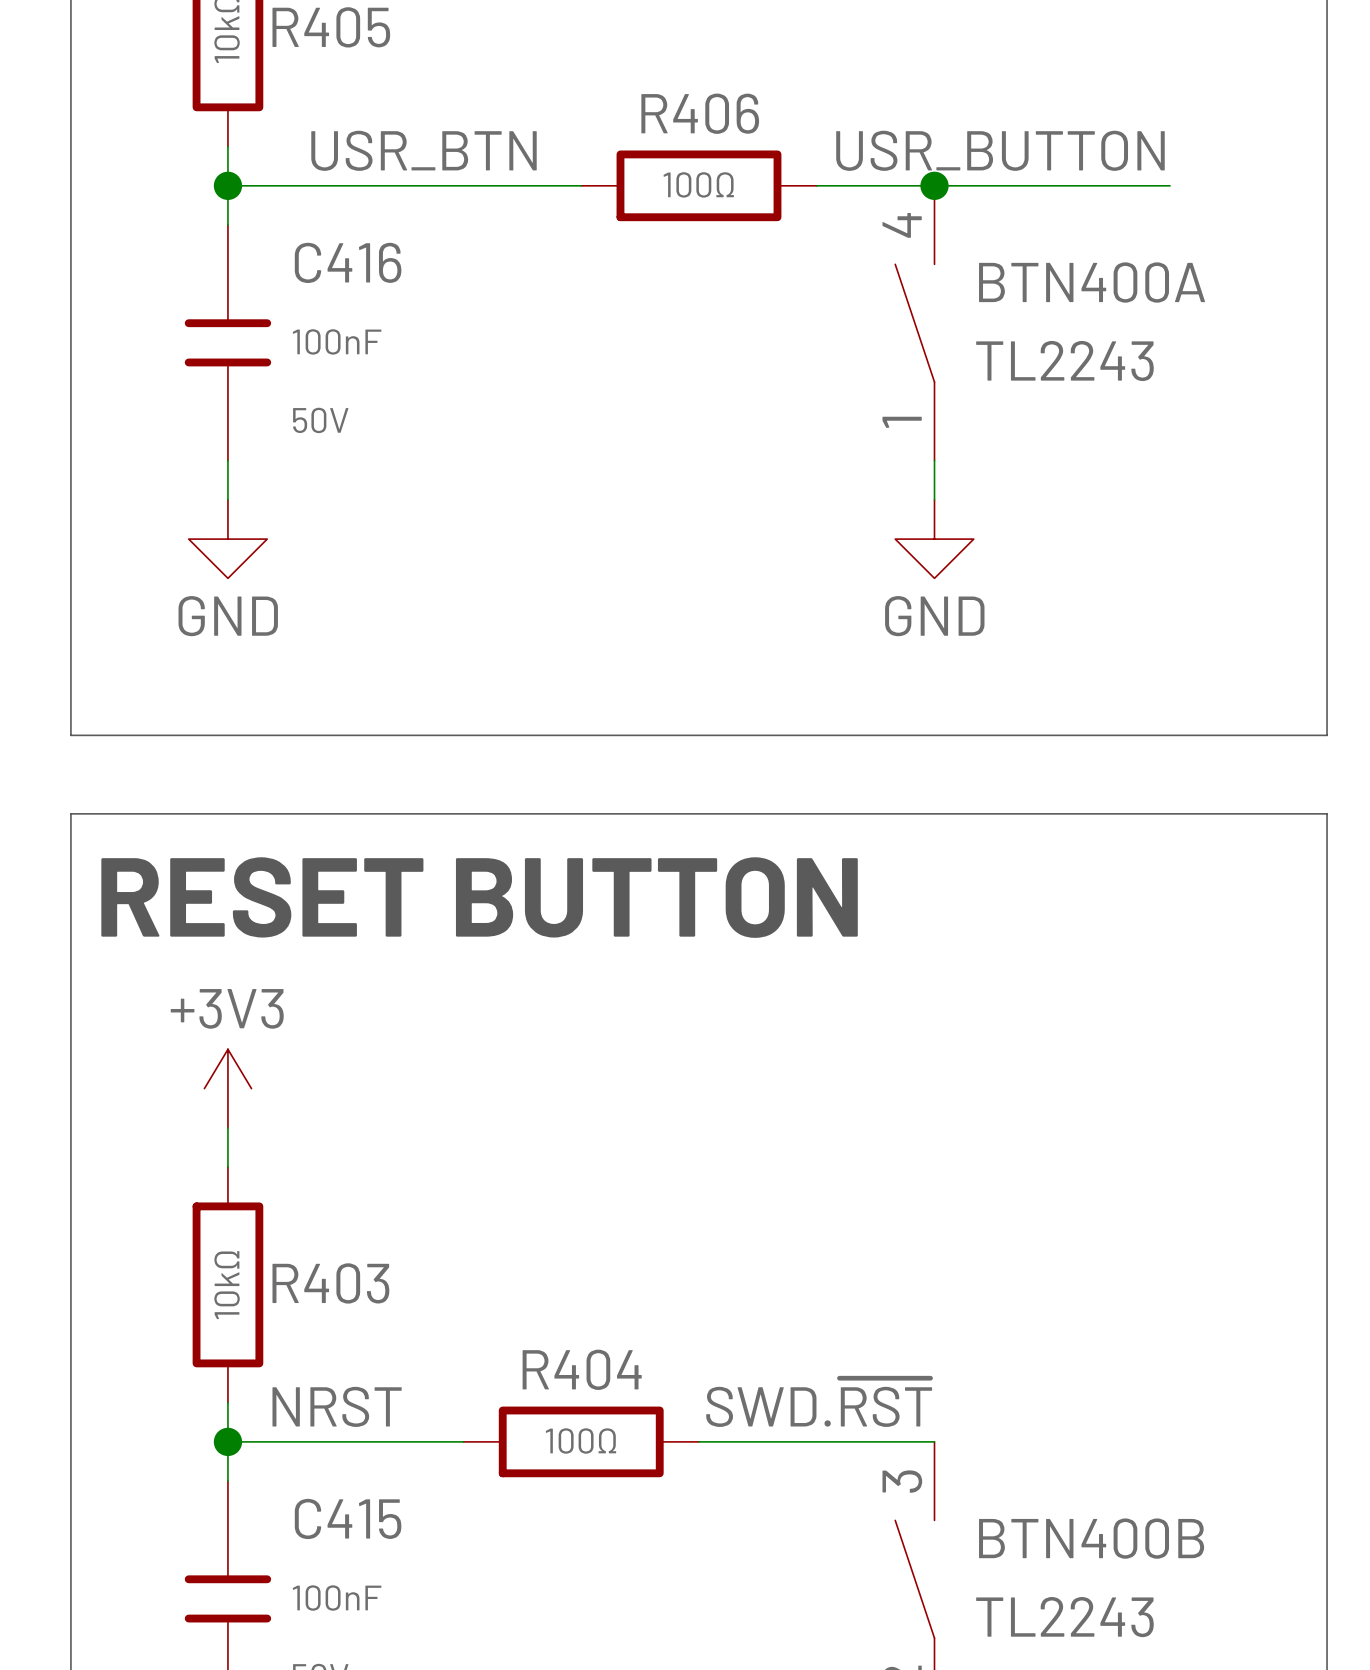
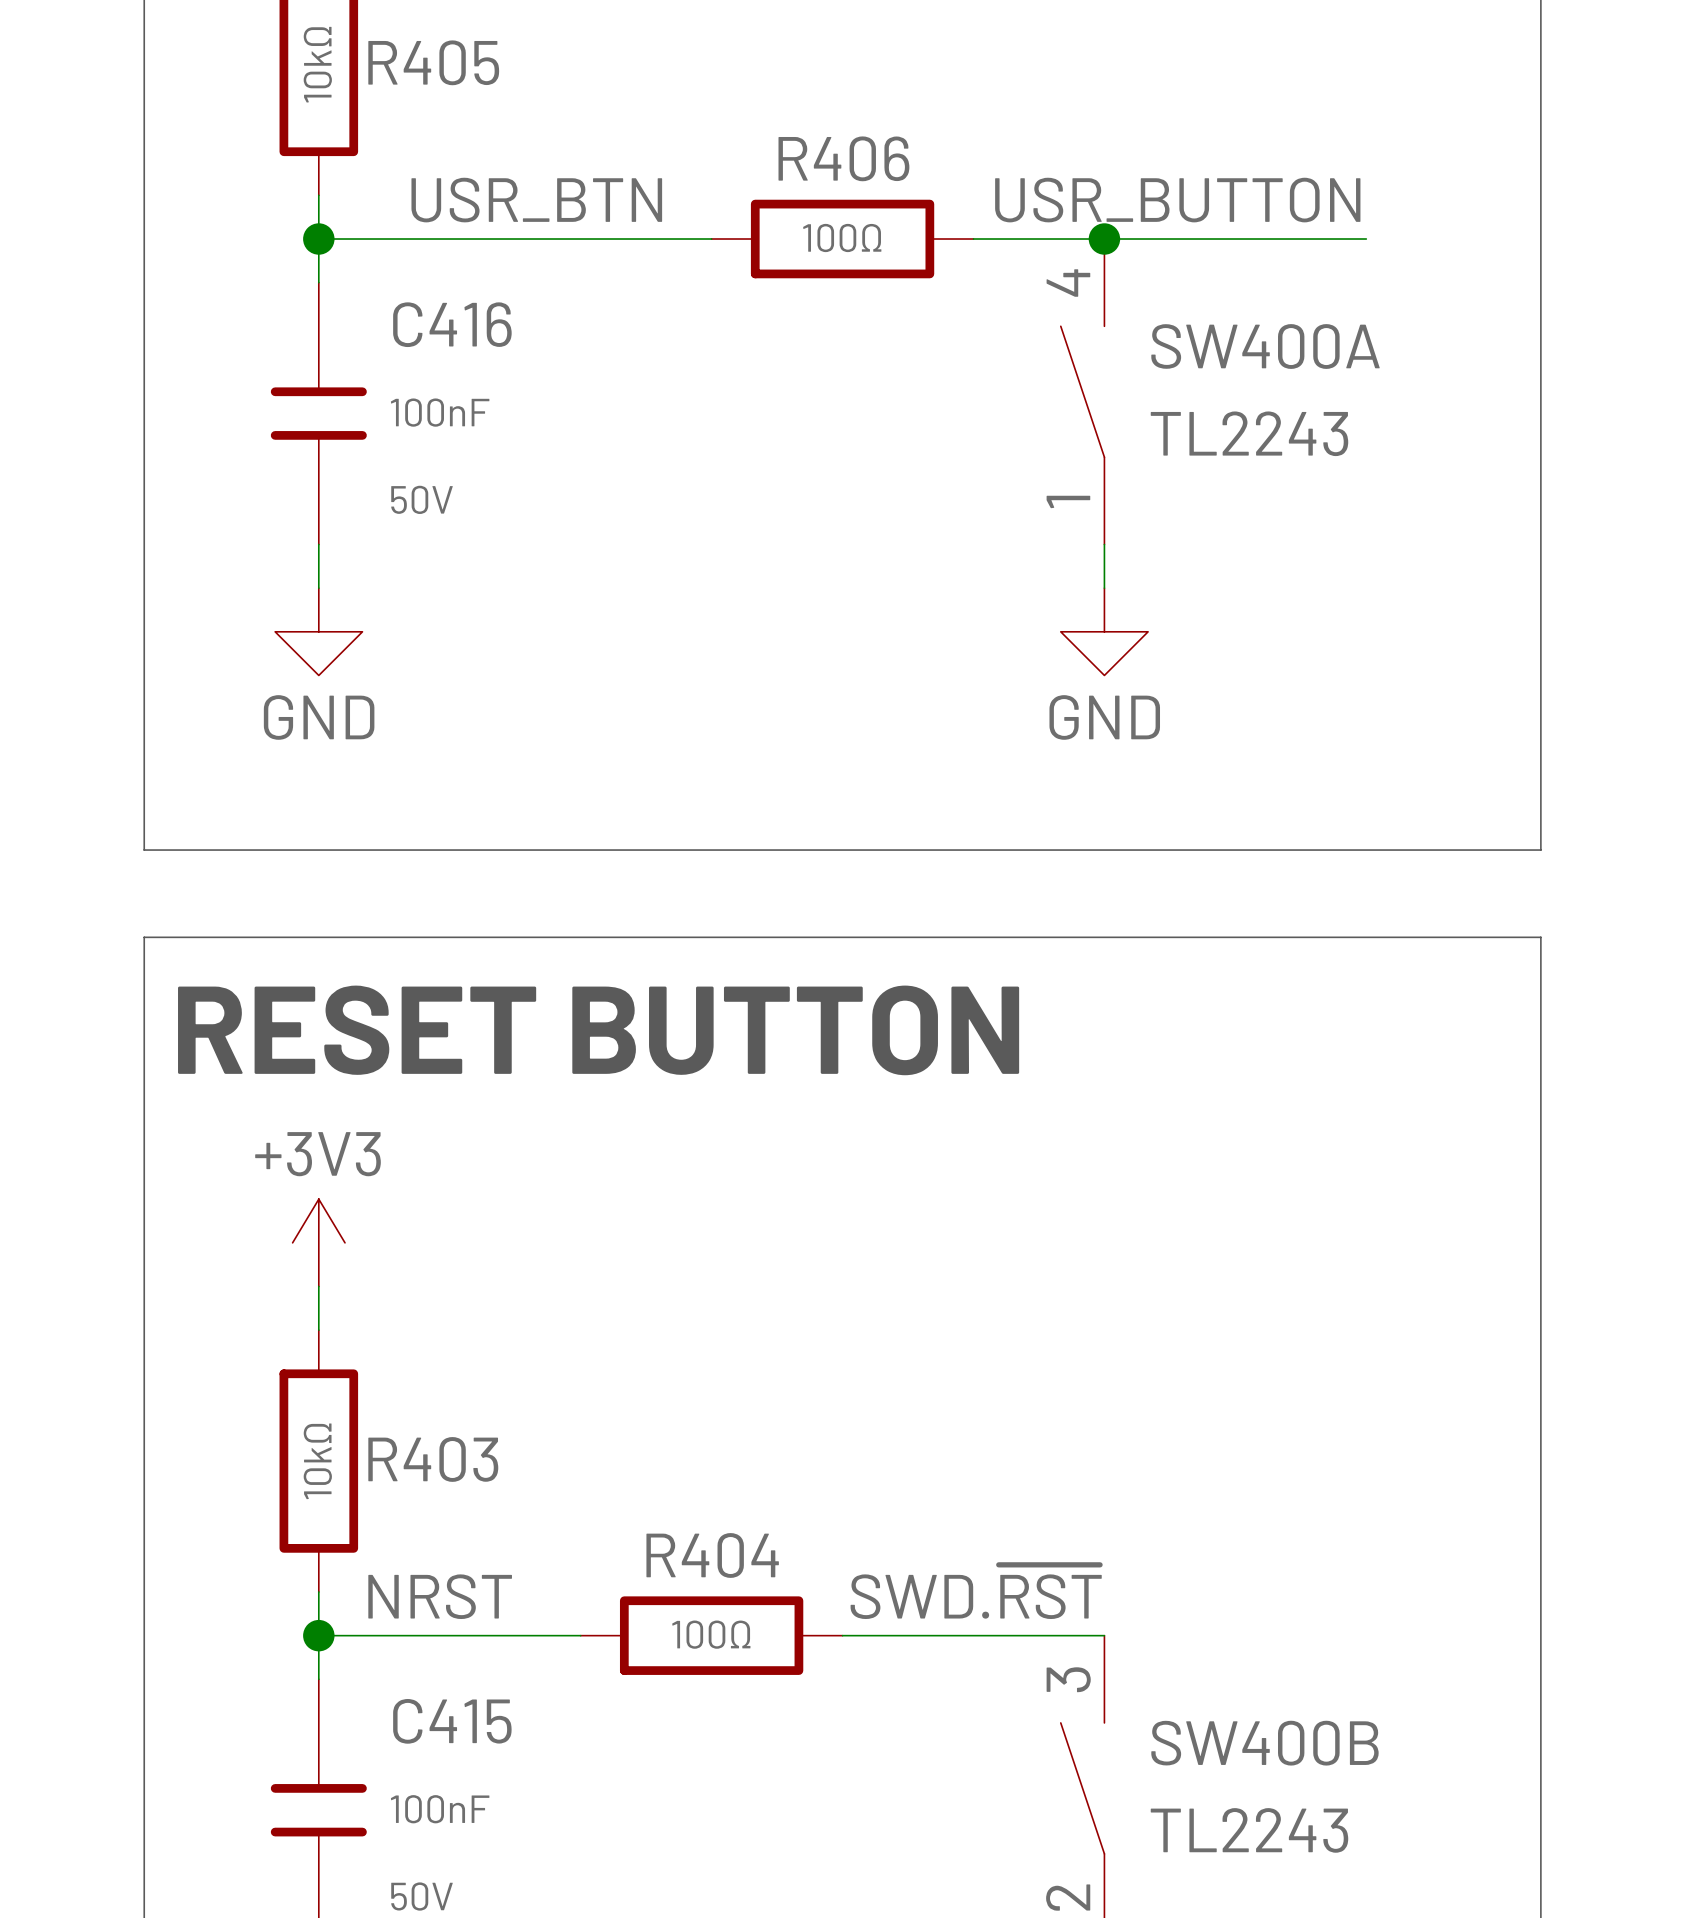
BTN400A name: BTN400A (1092, 282) -> SW400A (1265, 346)
BTN400B name: BTN400B (1091, 1538) -> SW400B (1264, 1743)

